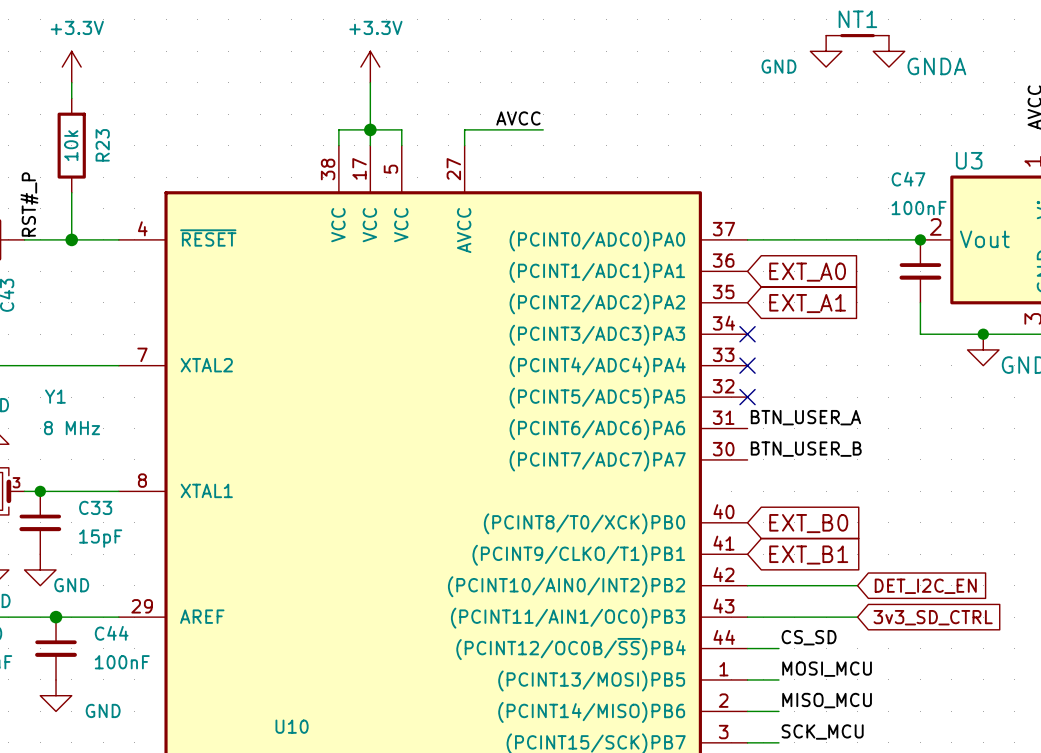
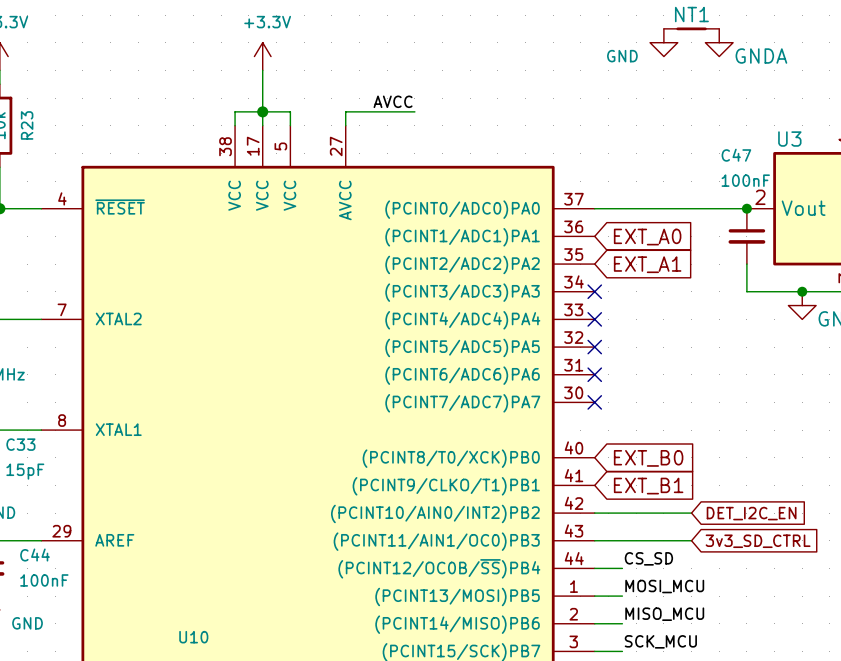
label: BTN_USER_A (805, 417) -> none
no-connect mark: none -> (594, 374)
label: BTN_USER_B (806, 449) -> none
no-connect mark: none -> (594, 402)

